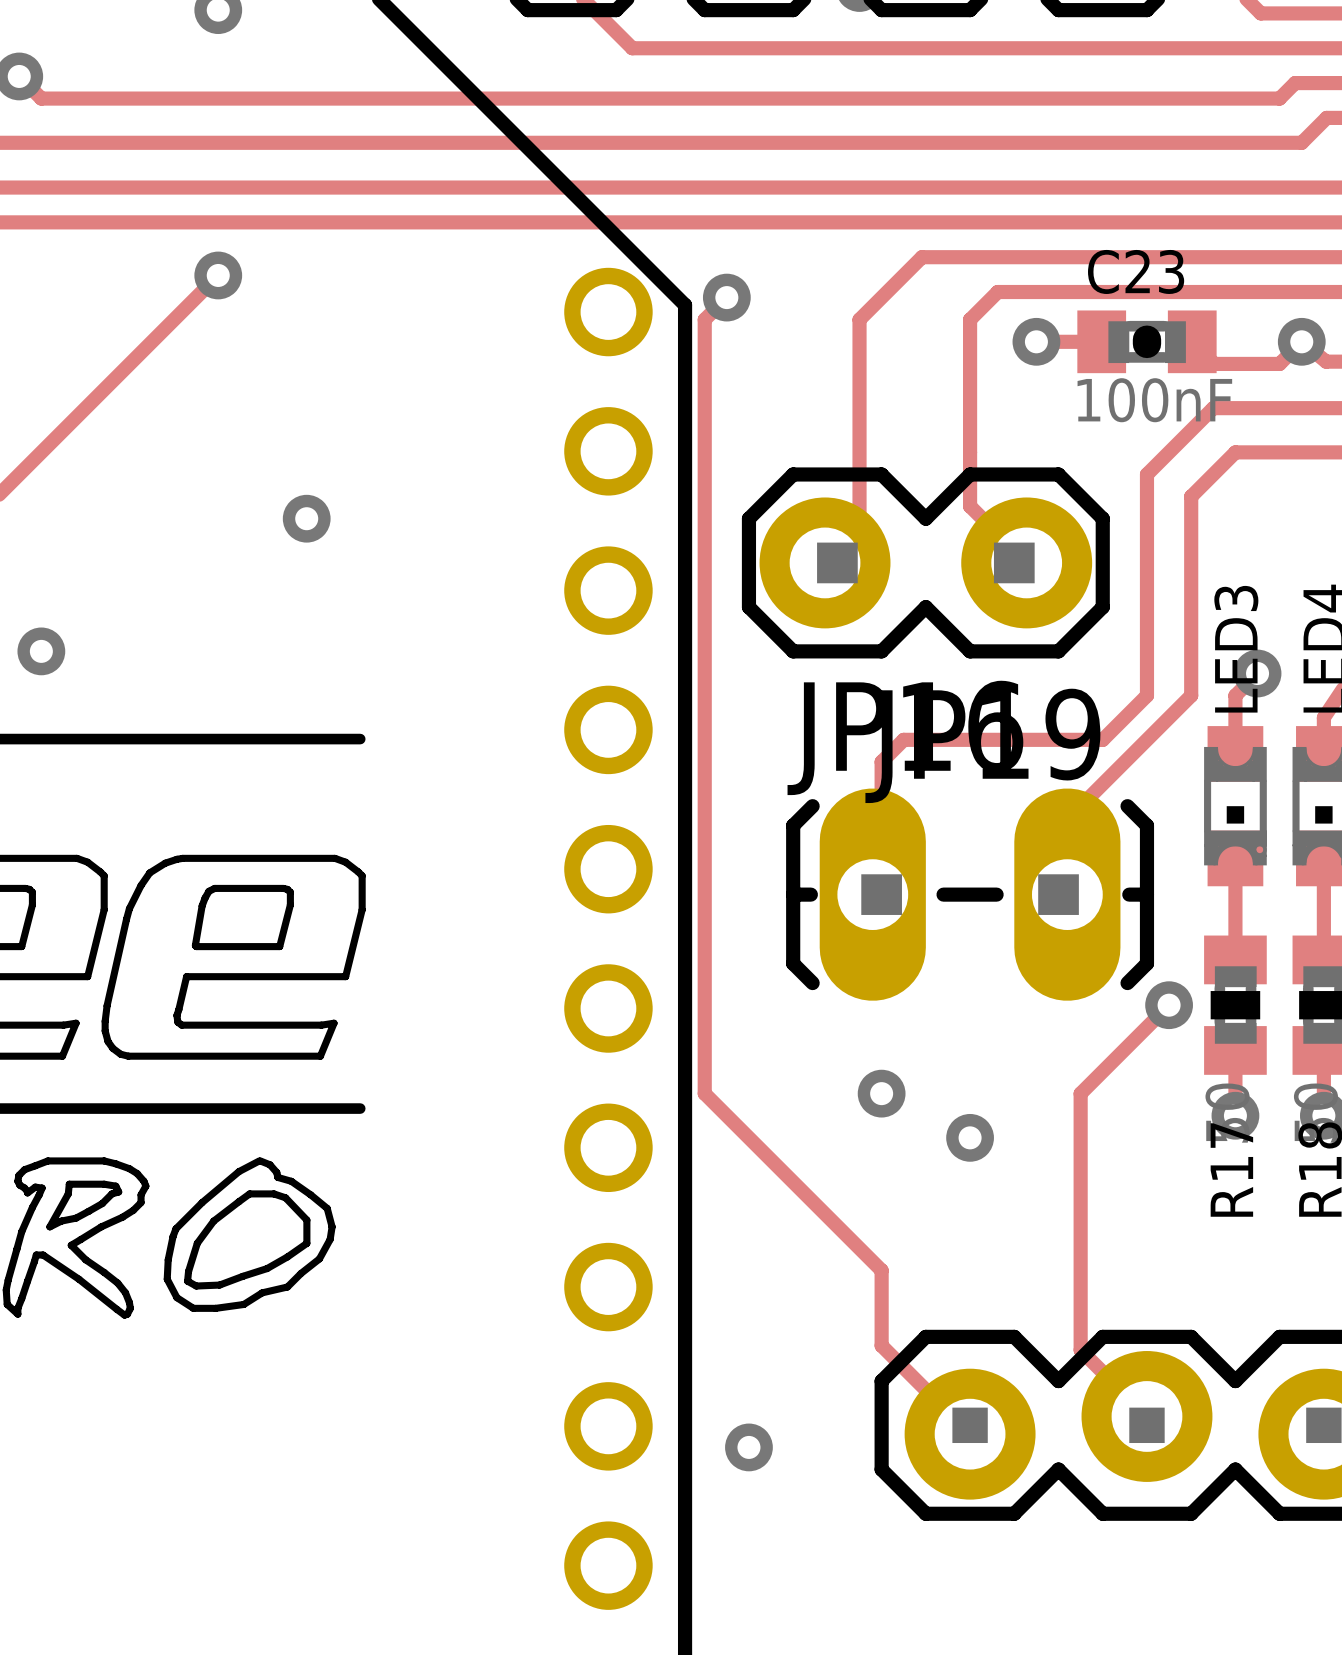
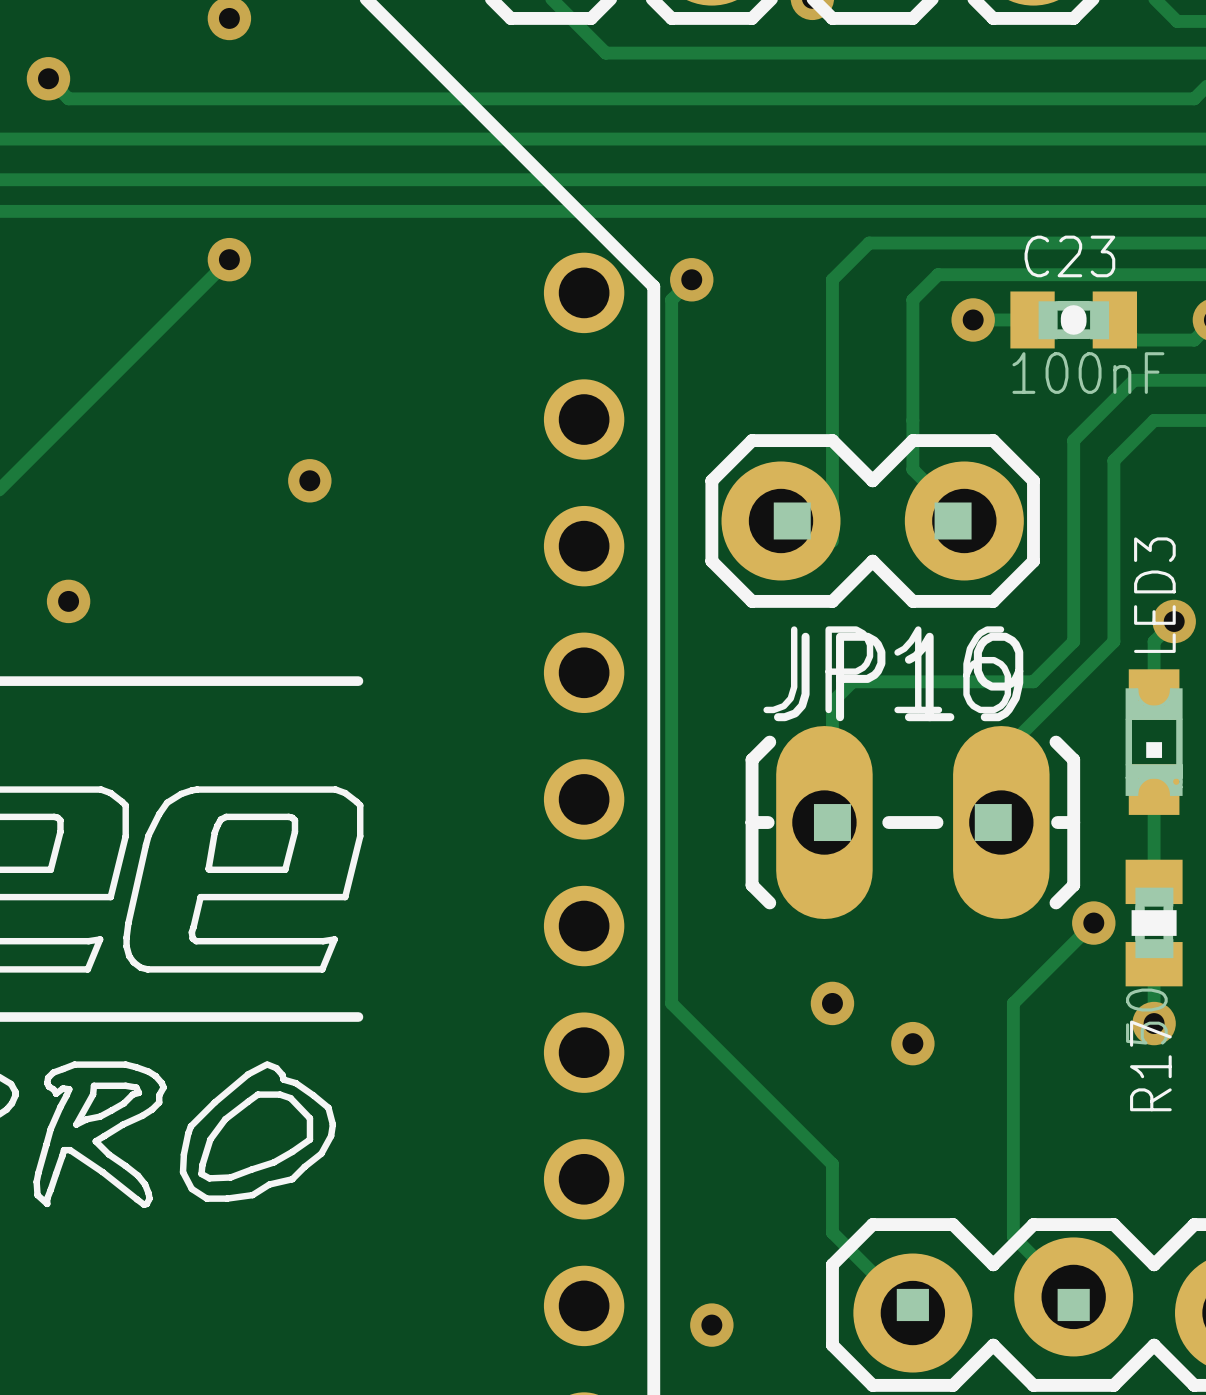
track: (881, 297) (859, 319) (859, 528) (825, 562) -> (832, 279) (832, 541)

